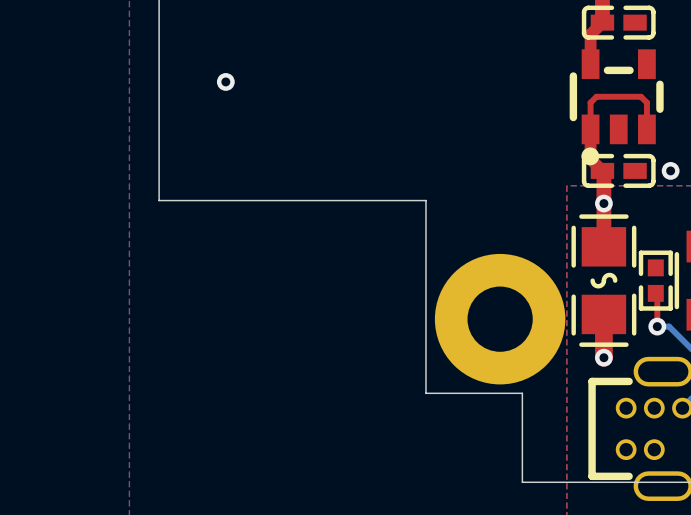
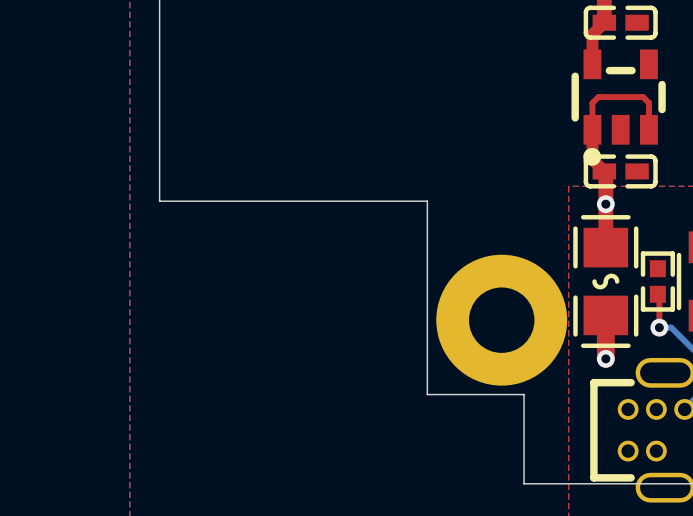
via: (225, 81) -> none
via: (670, 170) -> none

